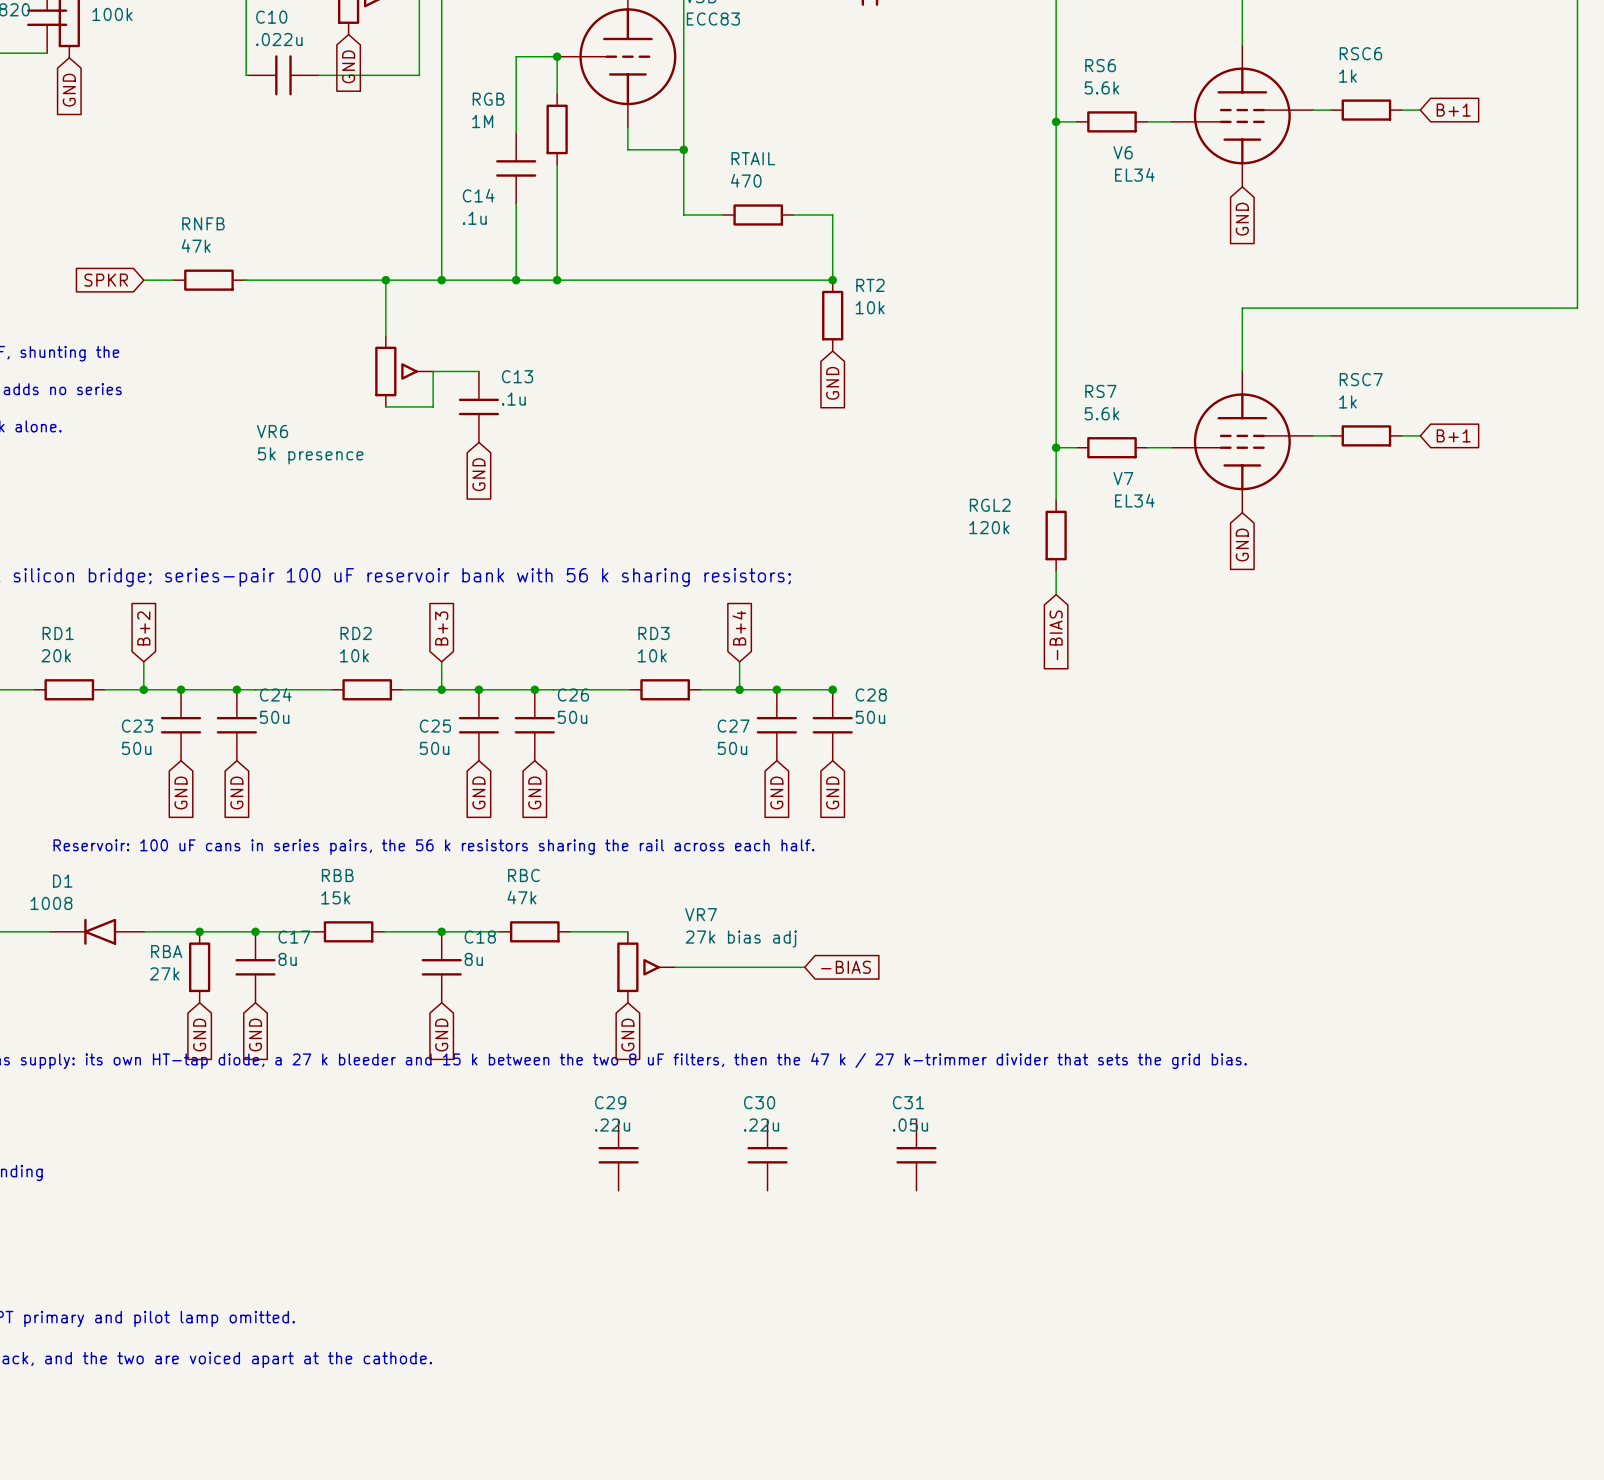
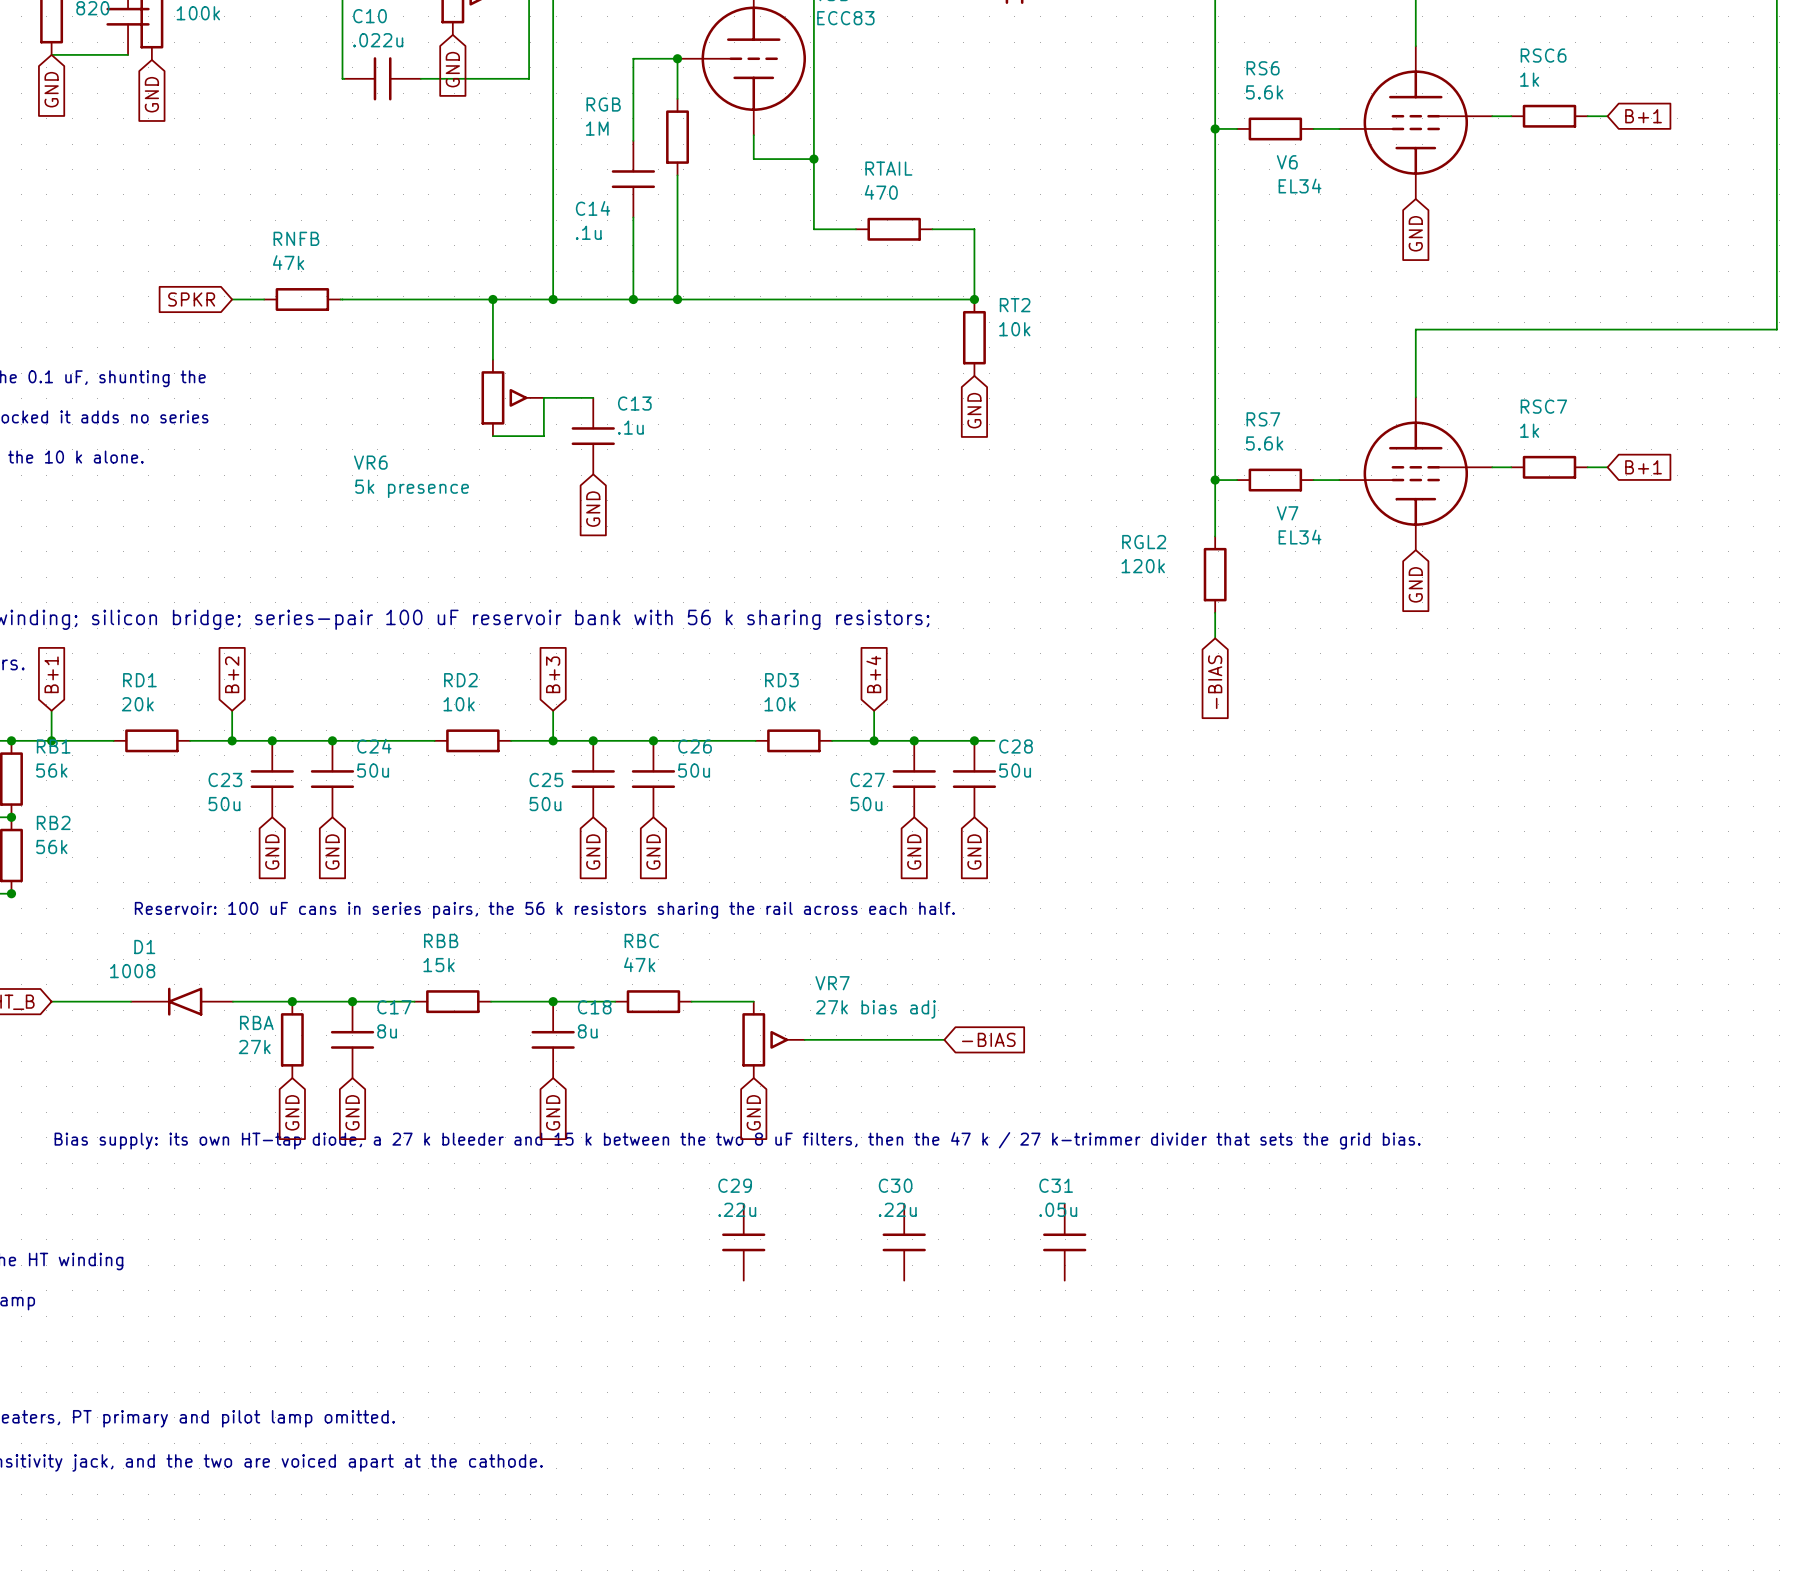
wire: none -> (974, 740) (994, 740)

